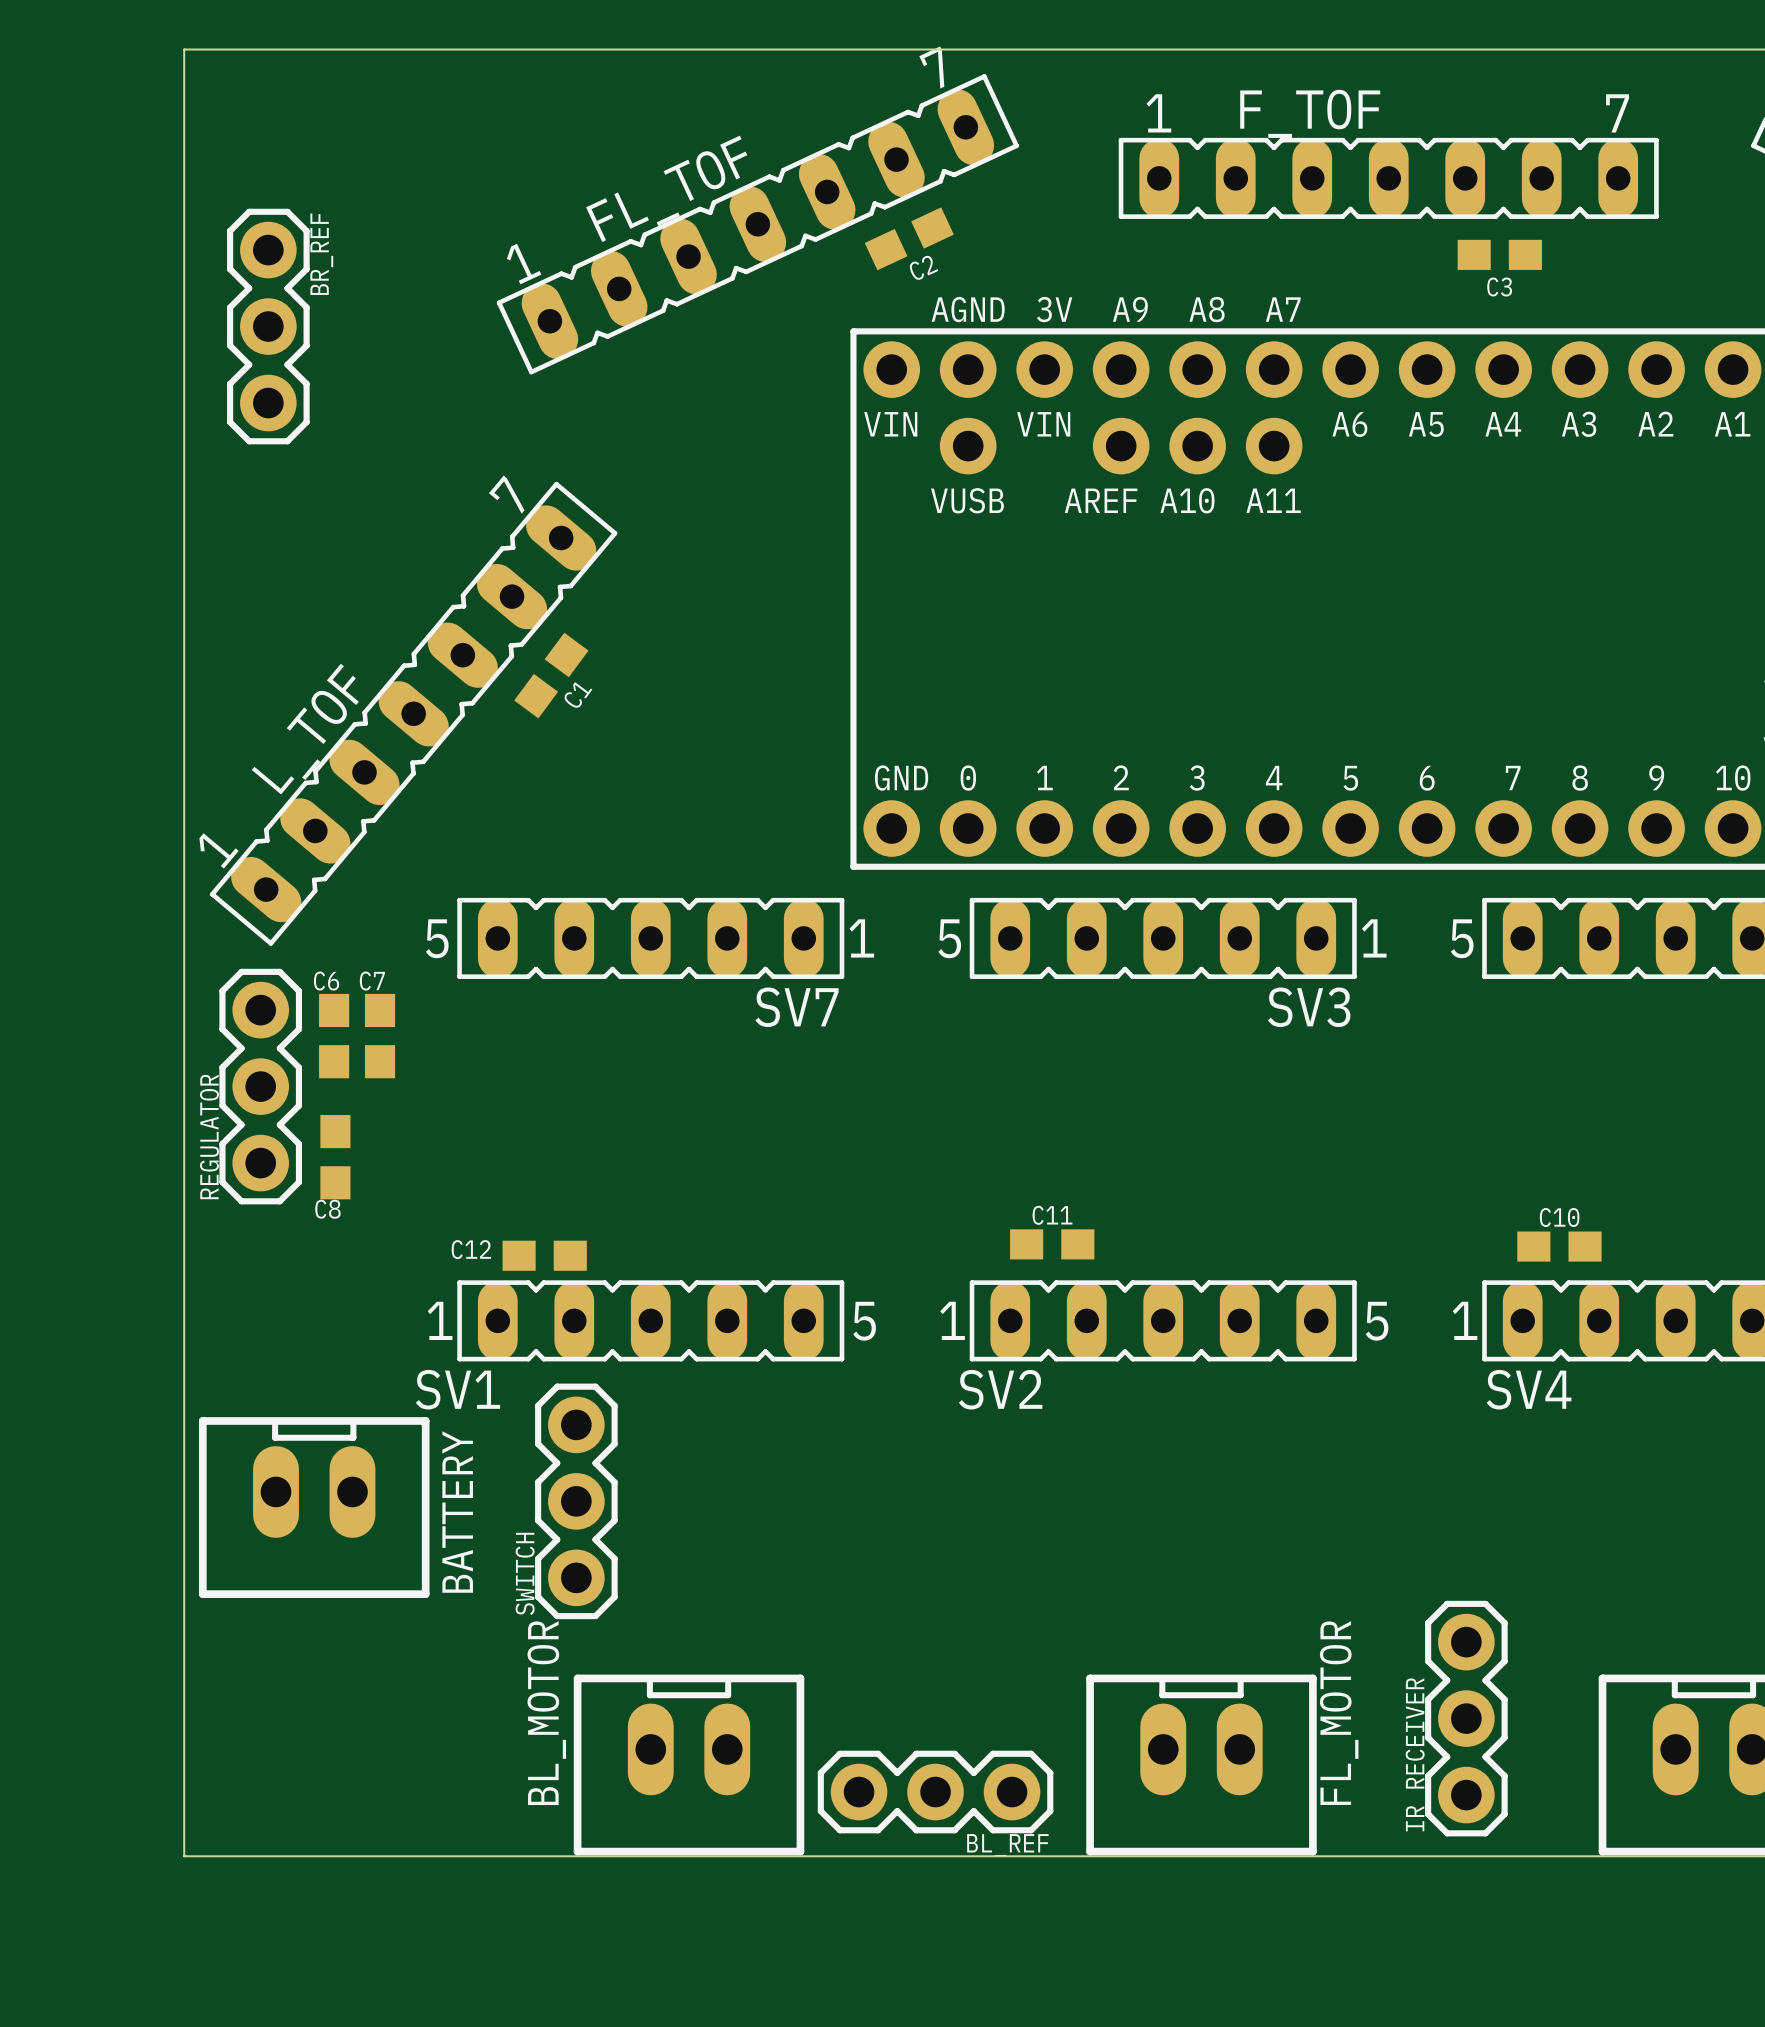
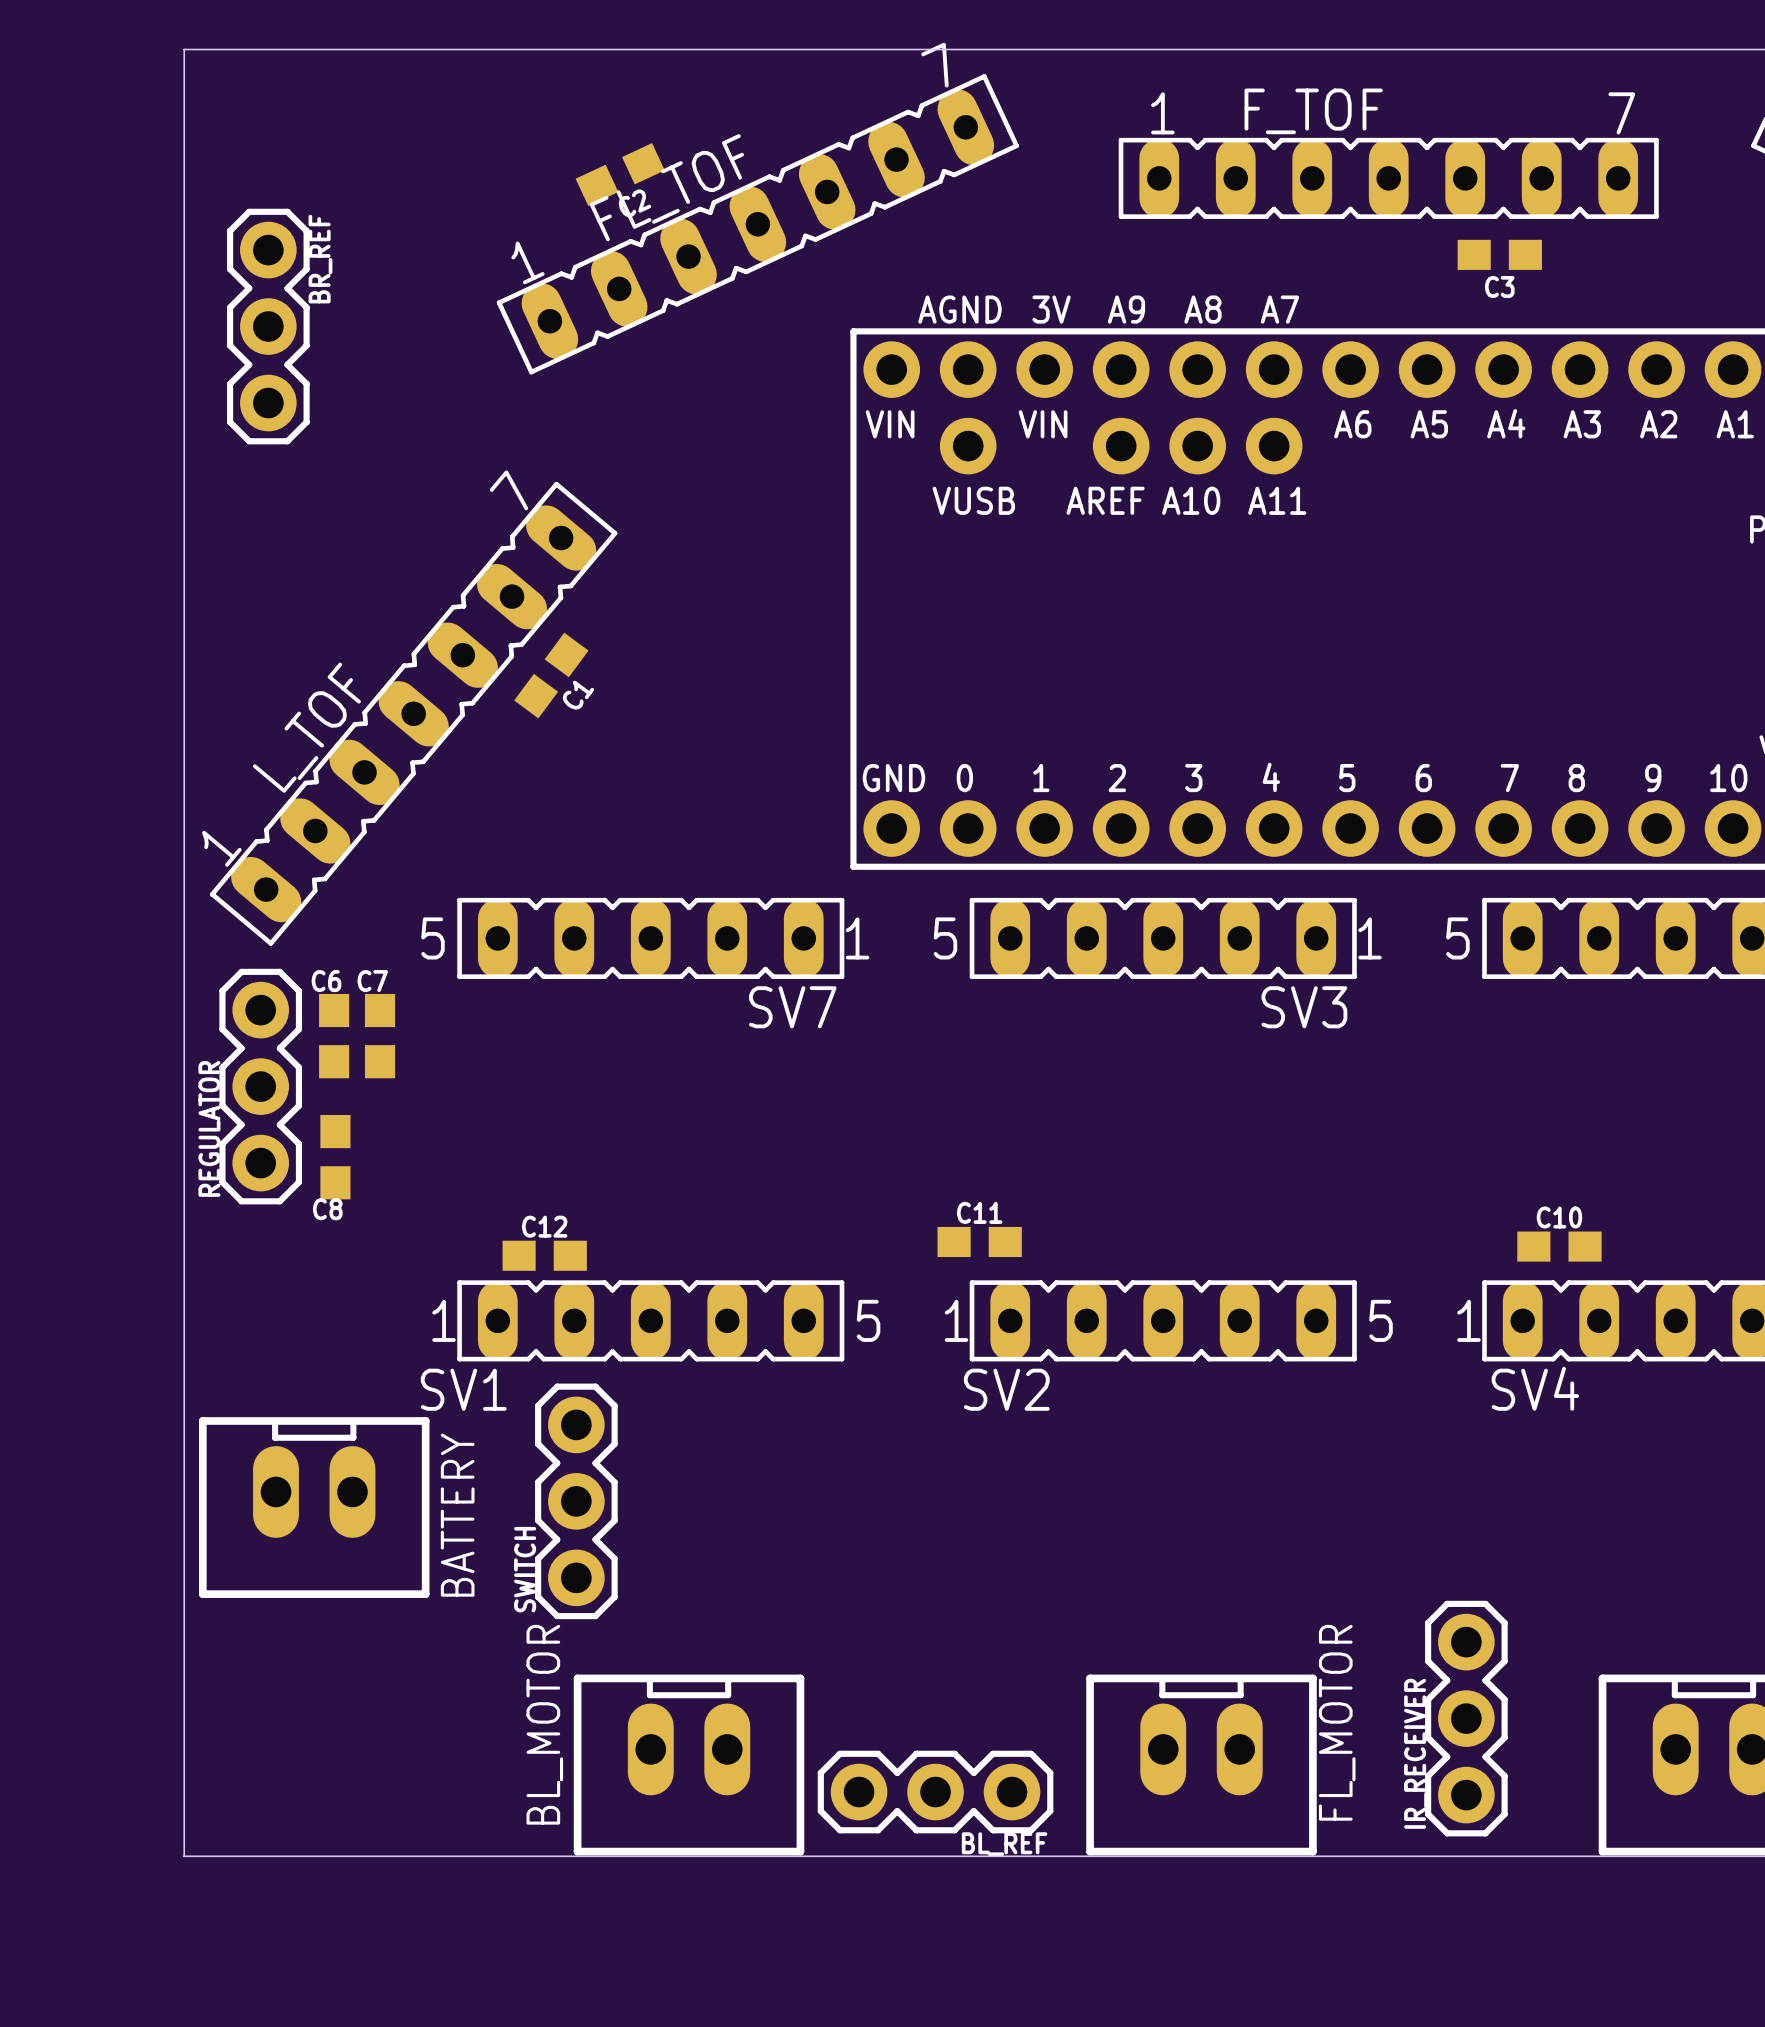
C2 position: (909, 238) -> (620, 174)
C11 position: (1052, 1244) -> (979, 1241)
C12 name position: C12 (471, 1249) -> C12 (544, 1226)

